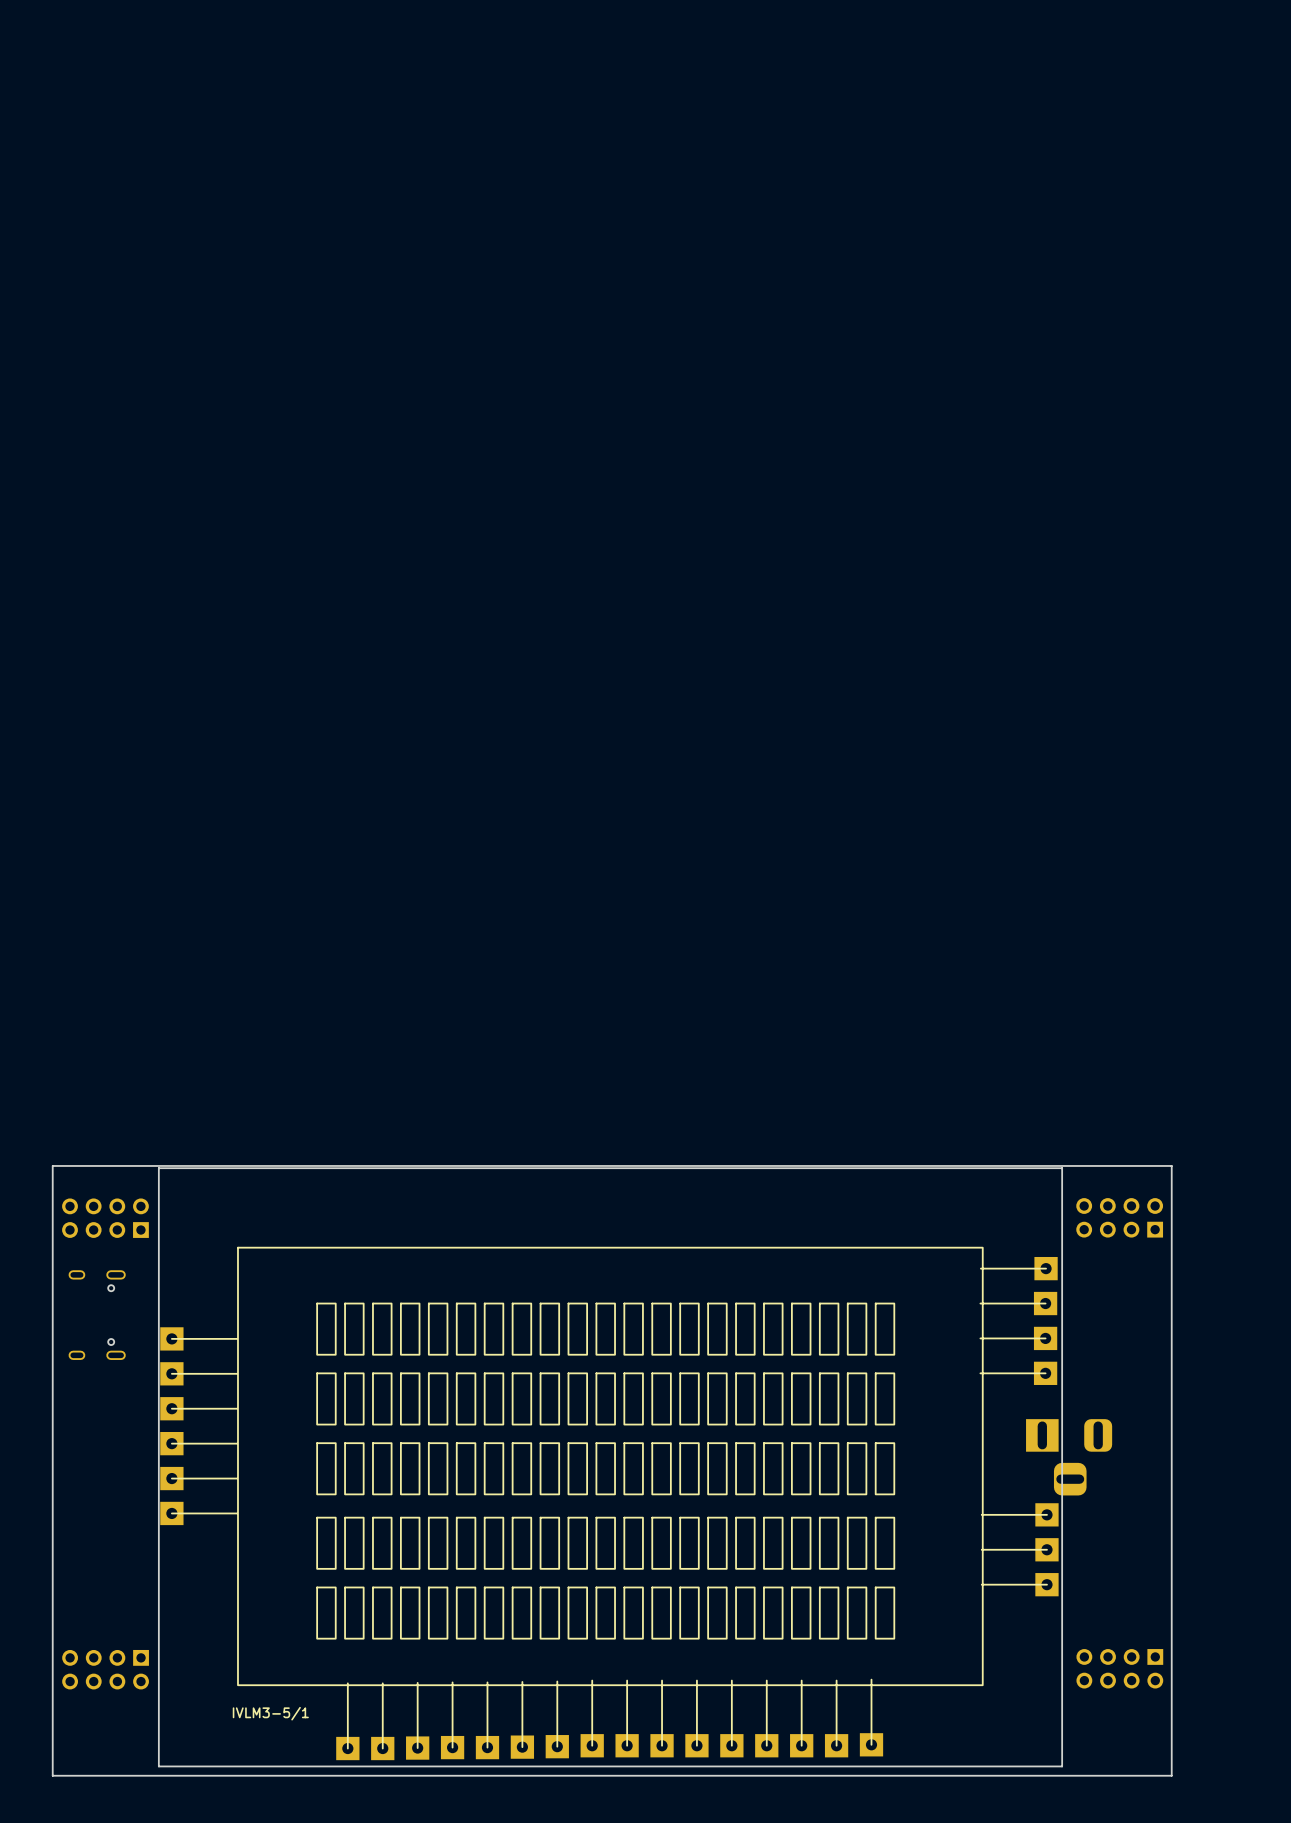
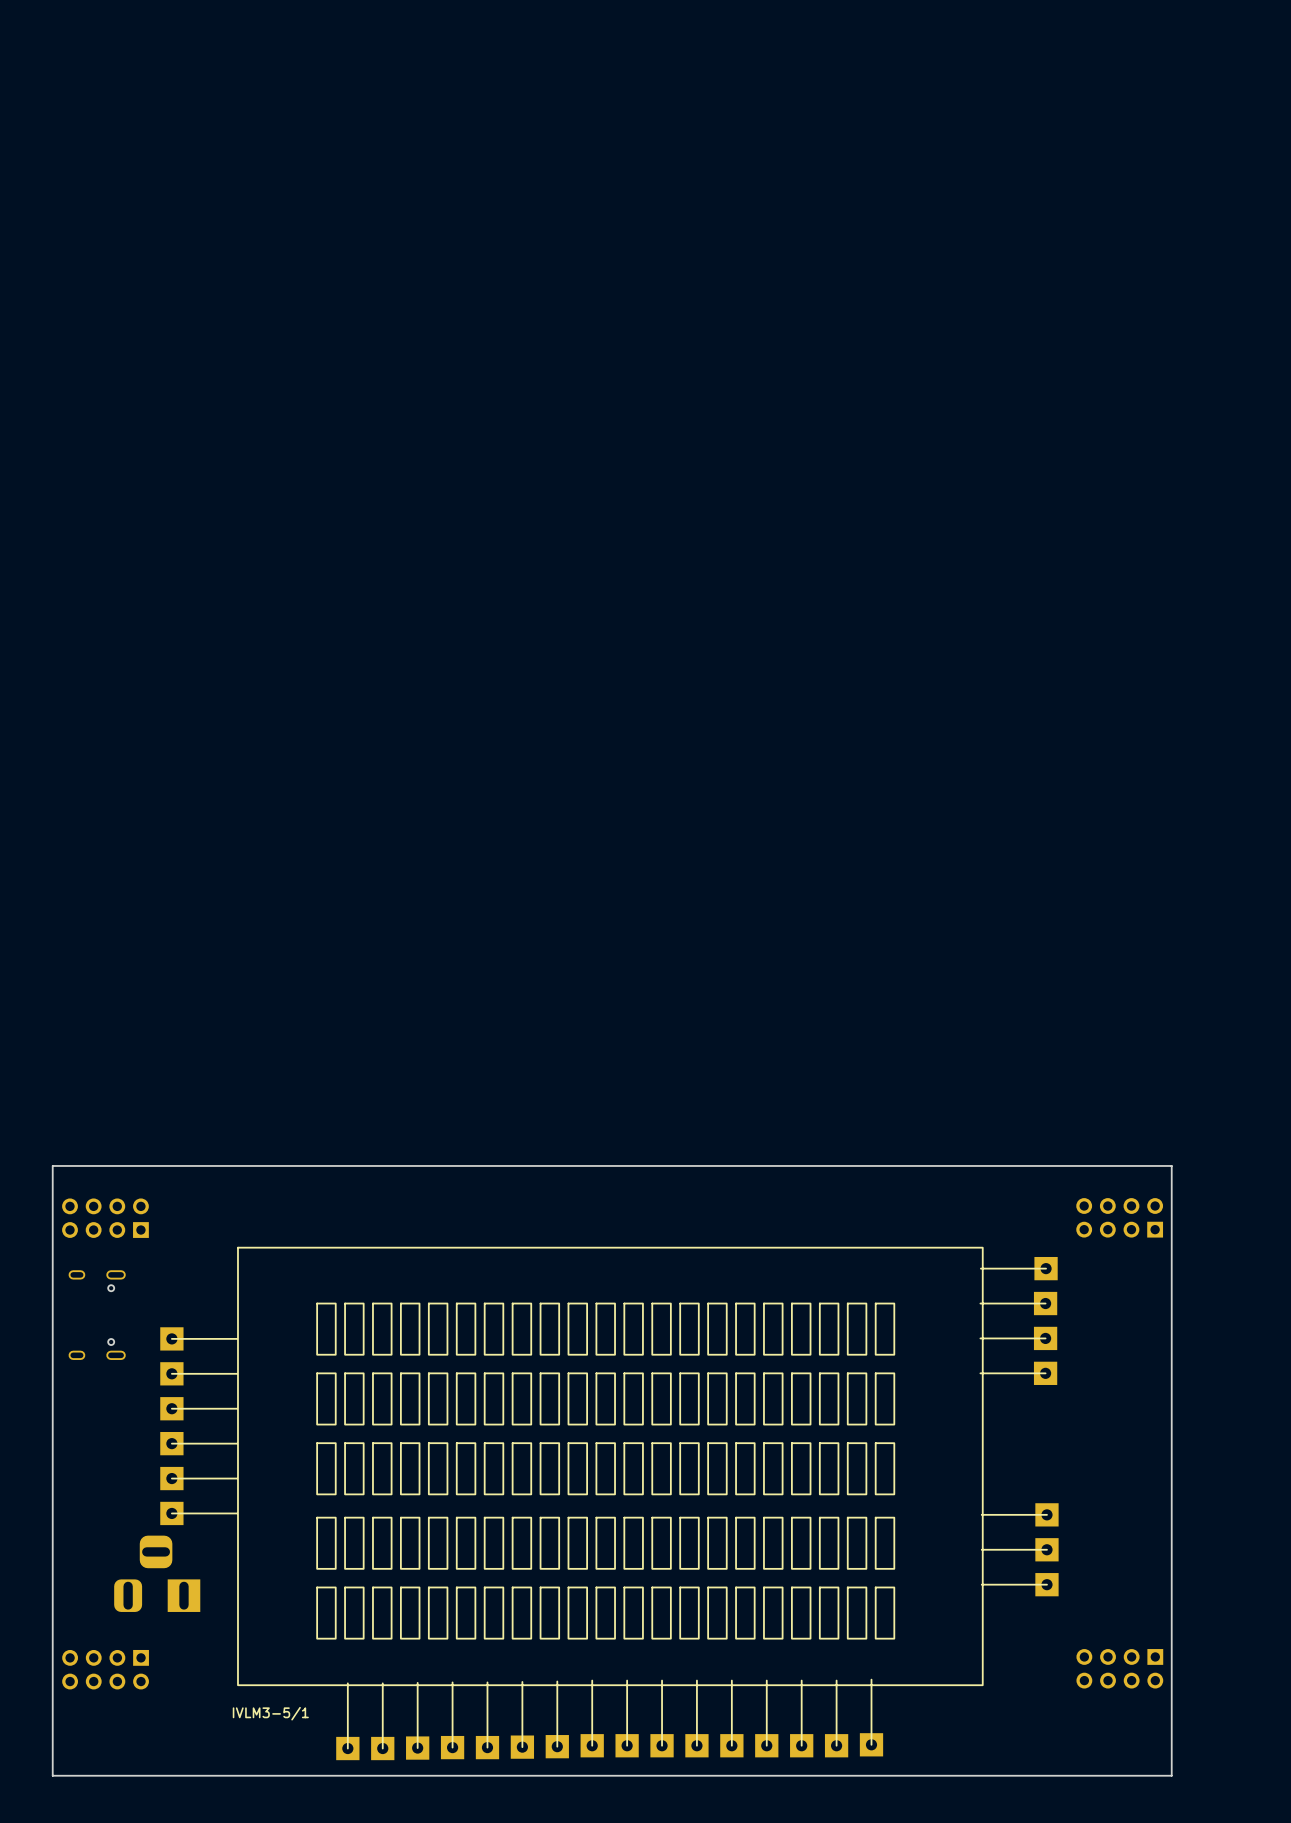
board edge: (1062, 1168) (158, 1168) (158, 1766) (1062, 1766) (1062, 1168) -> none
part: (1069, 1457) -> none
part: none -> (157, 1573)

